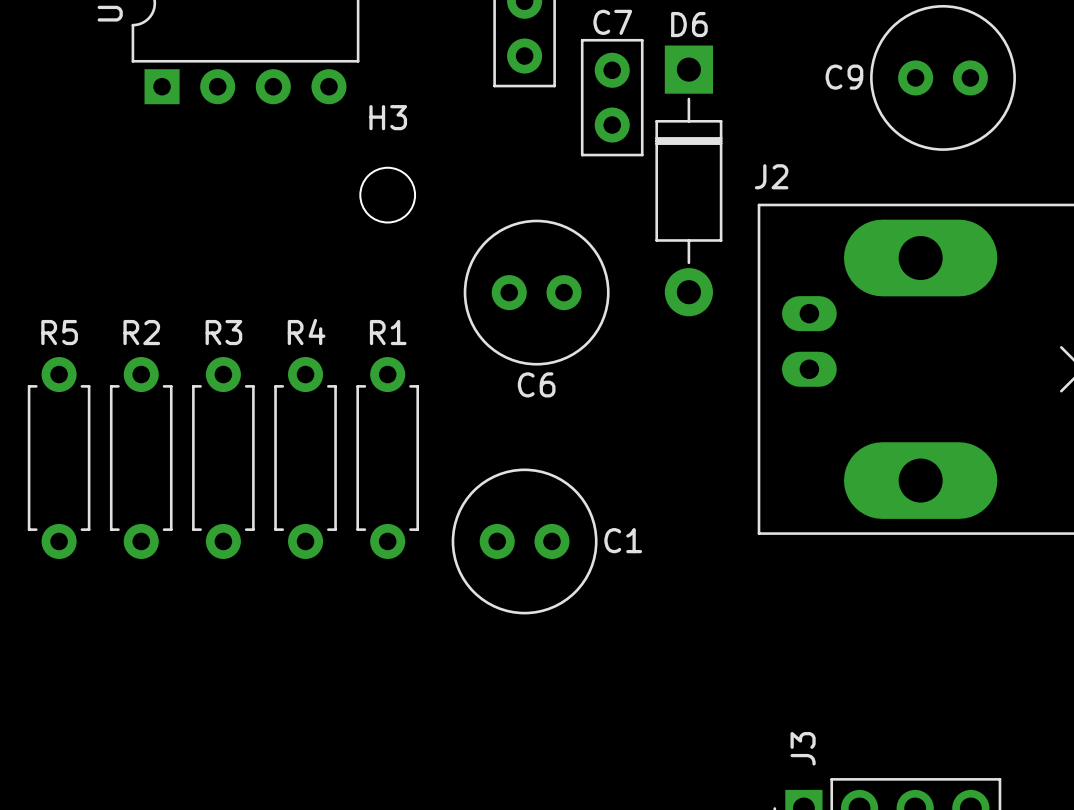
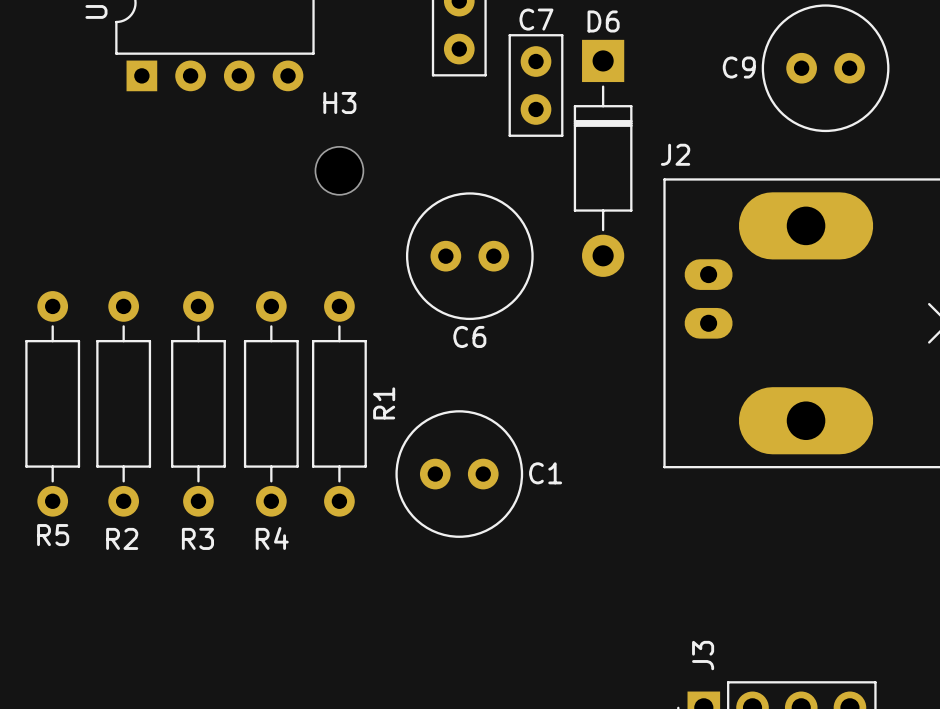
R5 name position: R5 (59, 332) -> R5 (53, 535)
R2 name position: R2 (141, 332) -> R2 (122, 538)
R3 name position: R3 (223, 332) -> R3 (197, 538)
R4 name position: R4 (306, 332) -> R4 (272, 538)
R1 name position: R1 (388, 332) -> R1 (384, 403)
R5 footprint: [27, 357, 91, 559] -> [25, 291, 81, 517]
R2 footprint: [109, 357, 173, 559] -> [96, 291, 152, 517]
R3 footprint: [192, 357, 255, 559] -> [171, 291, 226, 517]
R4 footprint: [274, 357, 337, 559] -> [243, 291, 299, 517]
R1 footprint: [356, 357, 420, 559] -> [311, 291, 367, 517]

